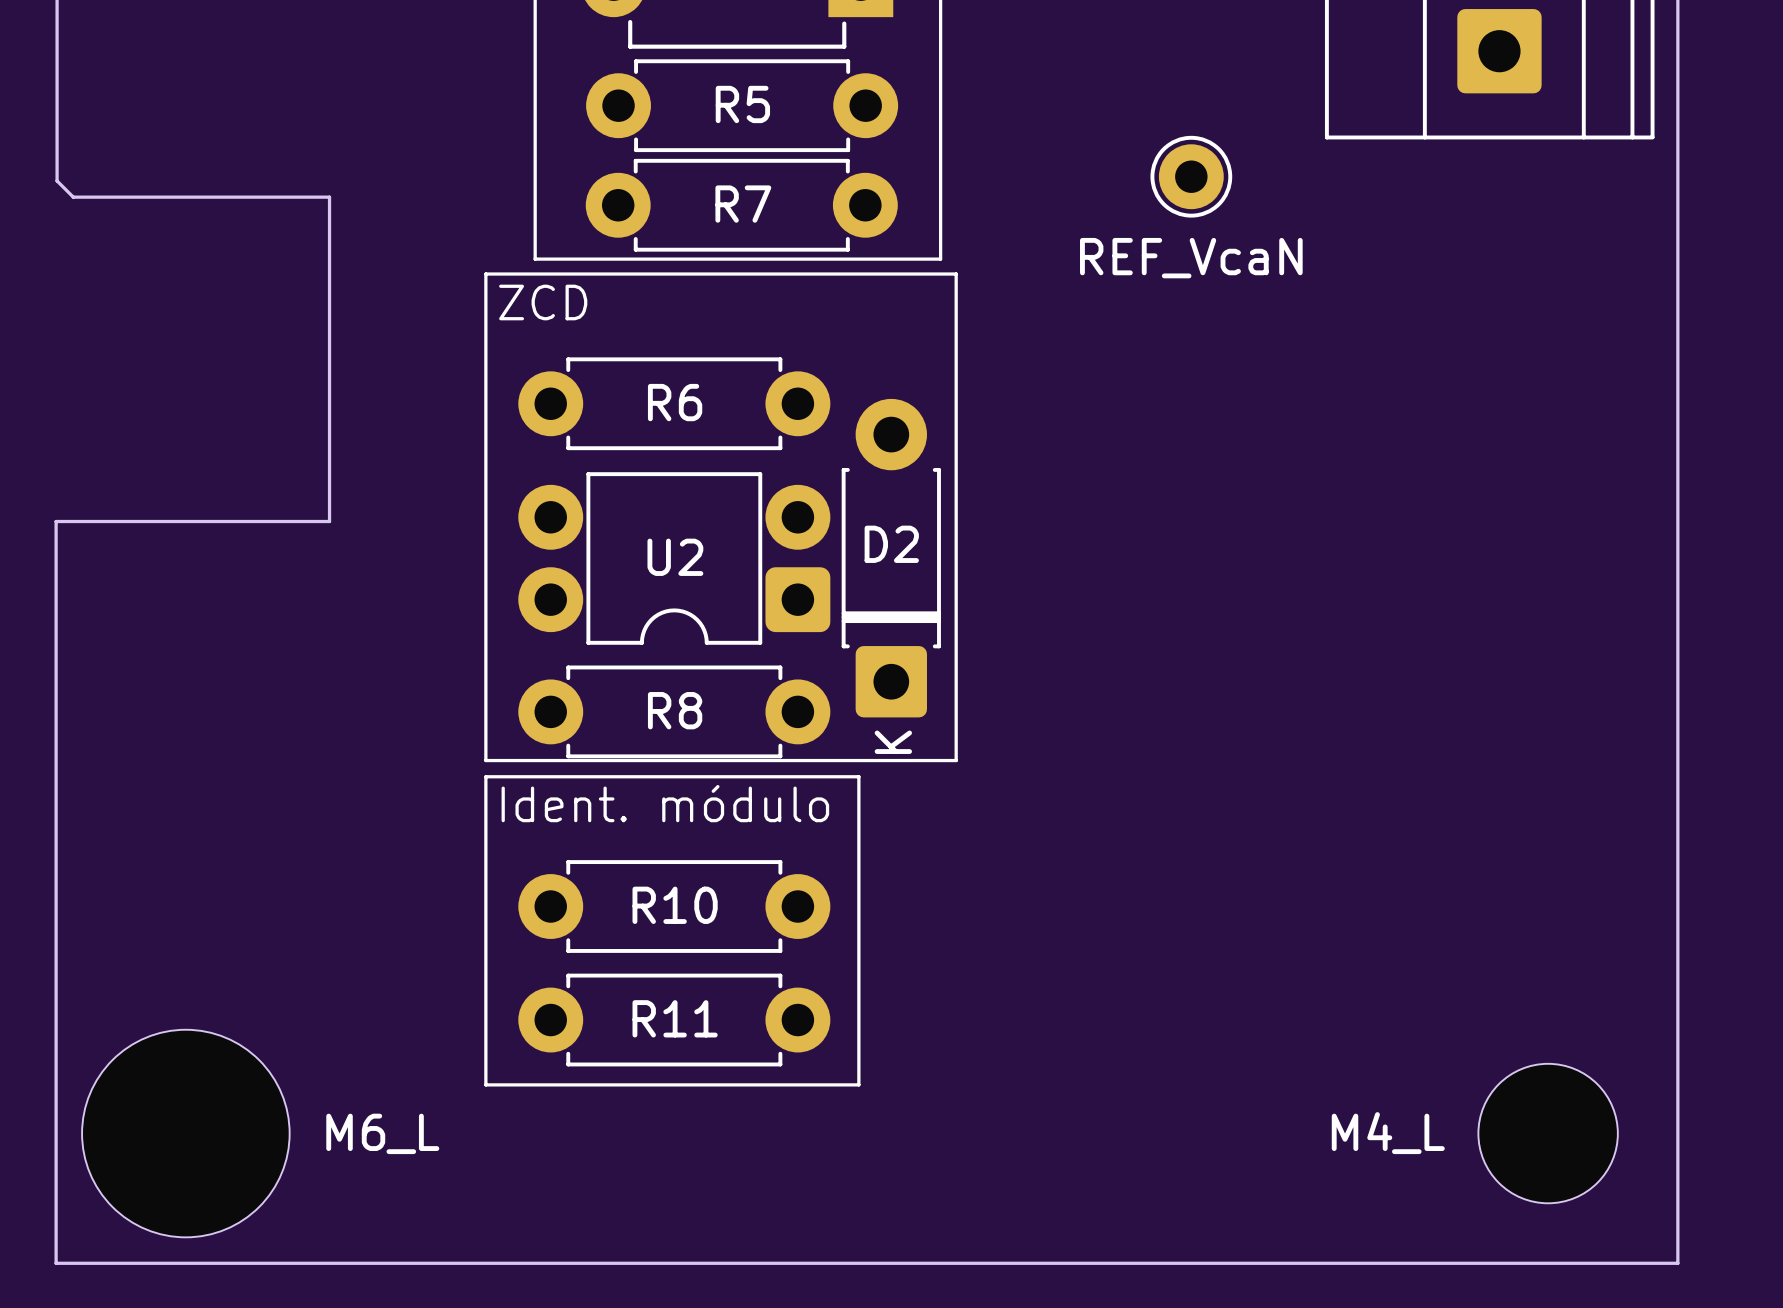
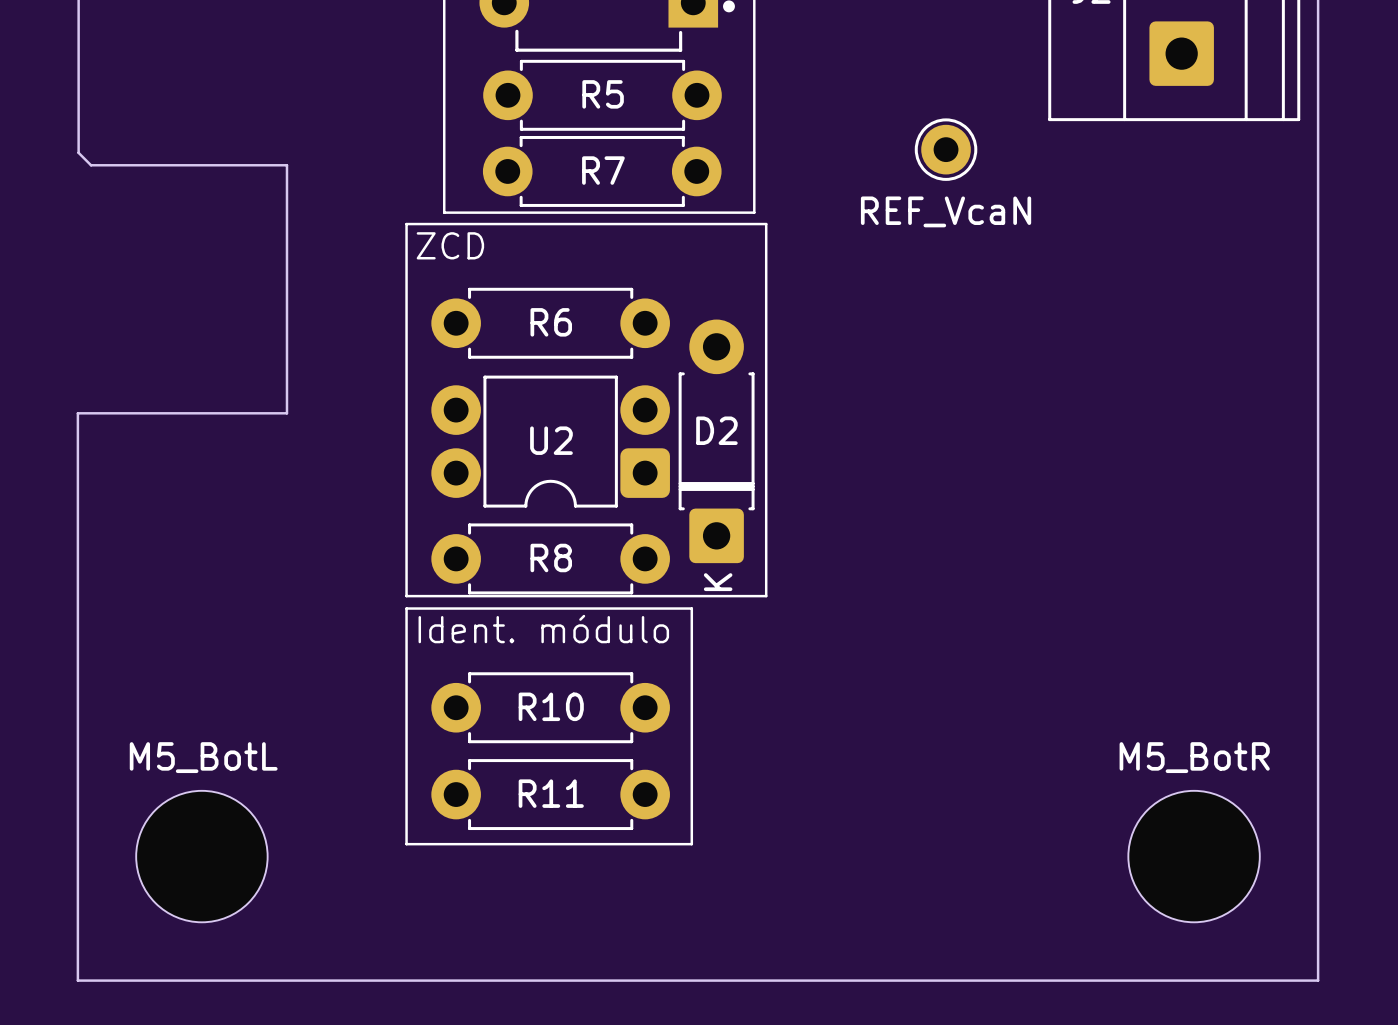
M5_BotL: none -> (201, 856)
M5_BotR: none -> (1194, 856)
M6_L: (185, 1133) -> none
M4_L: (1548, 1133) -> none

